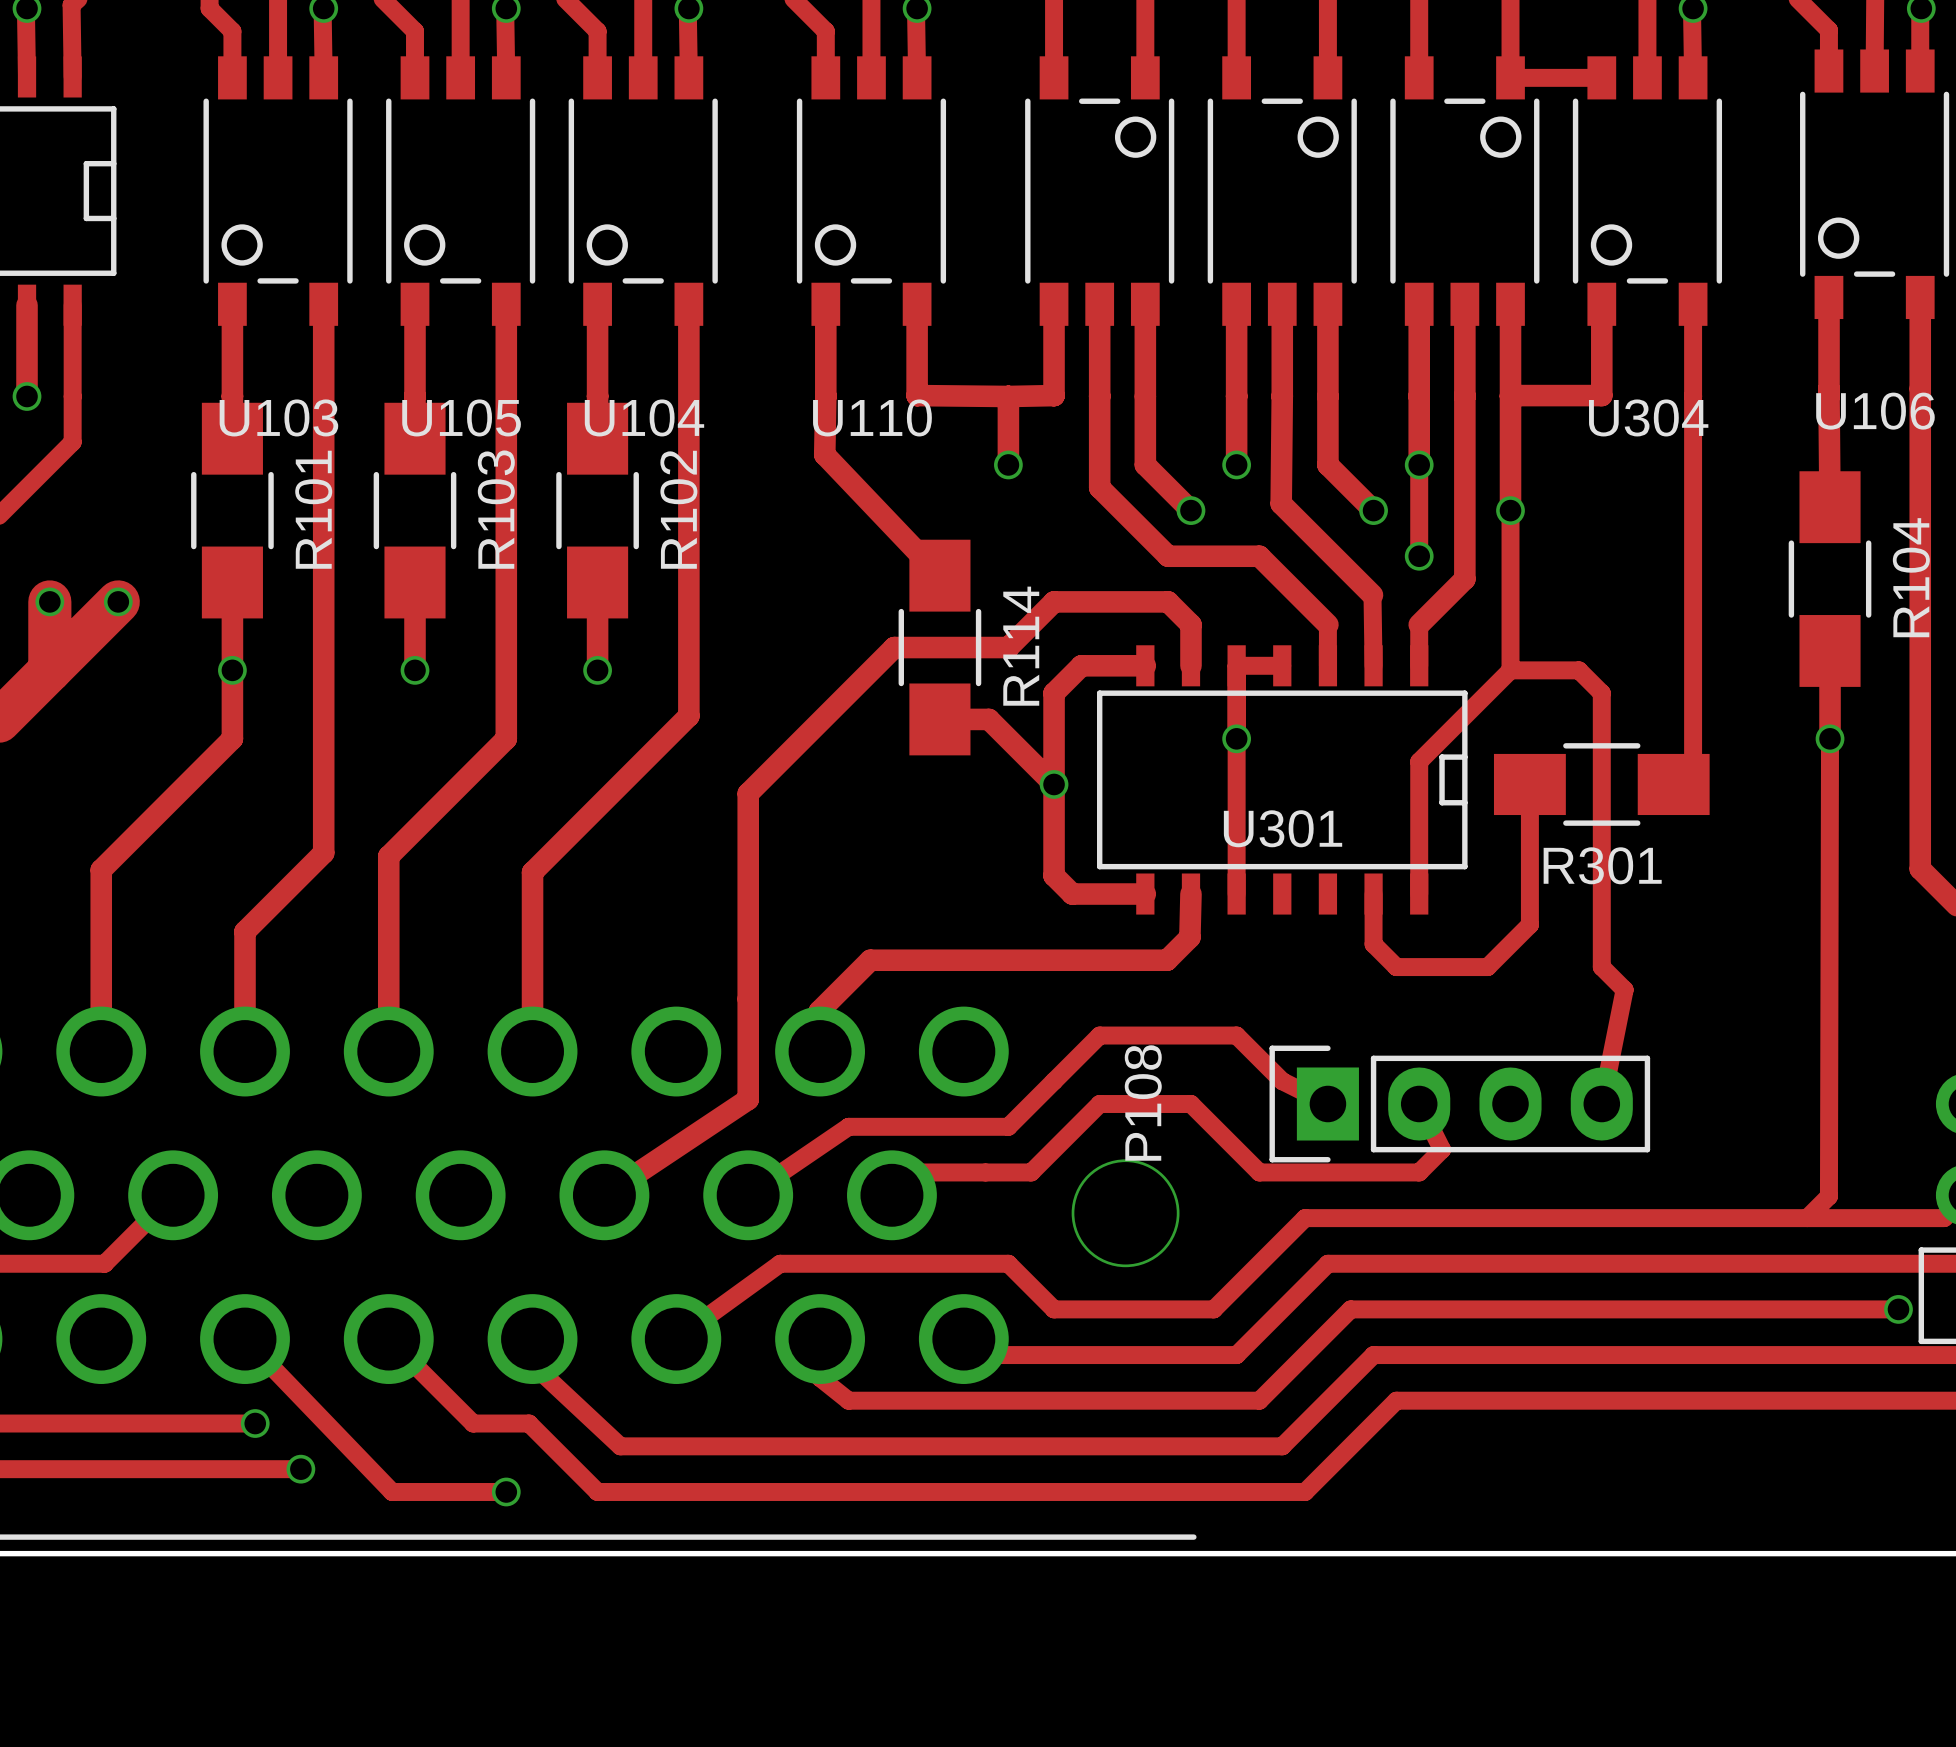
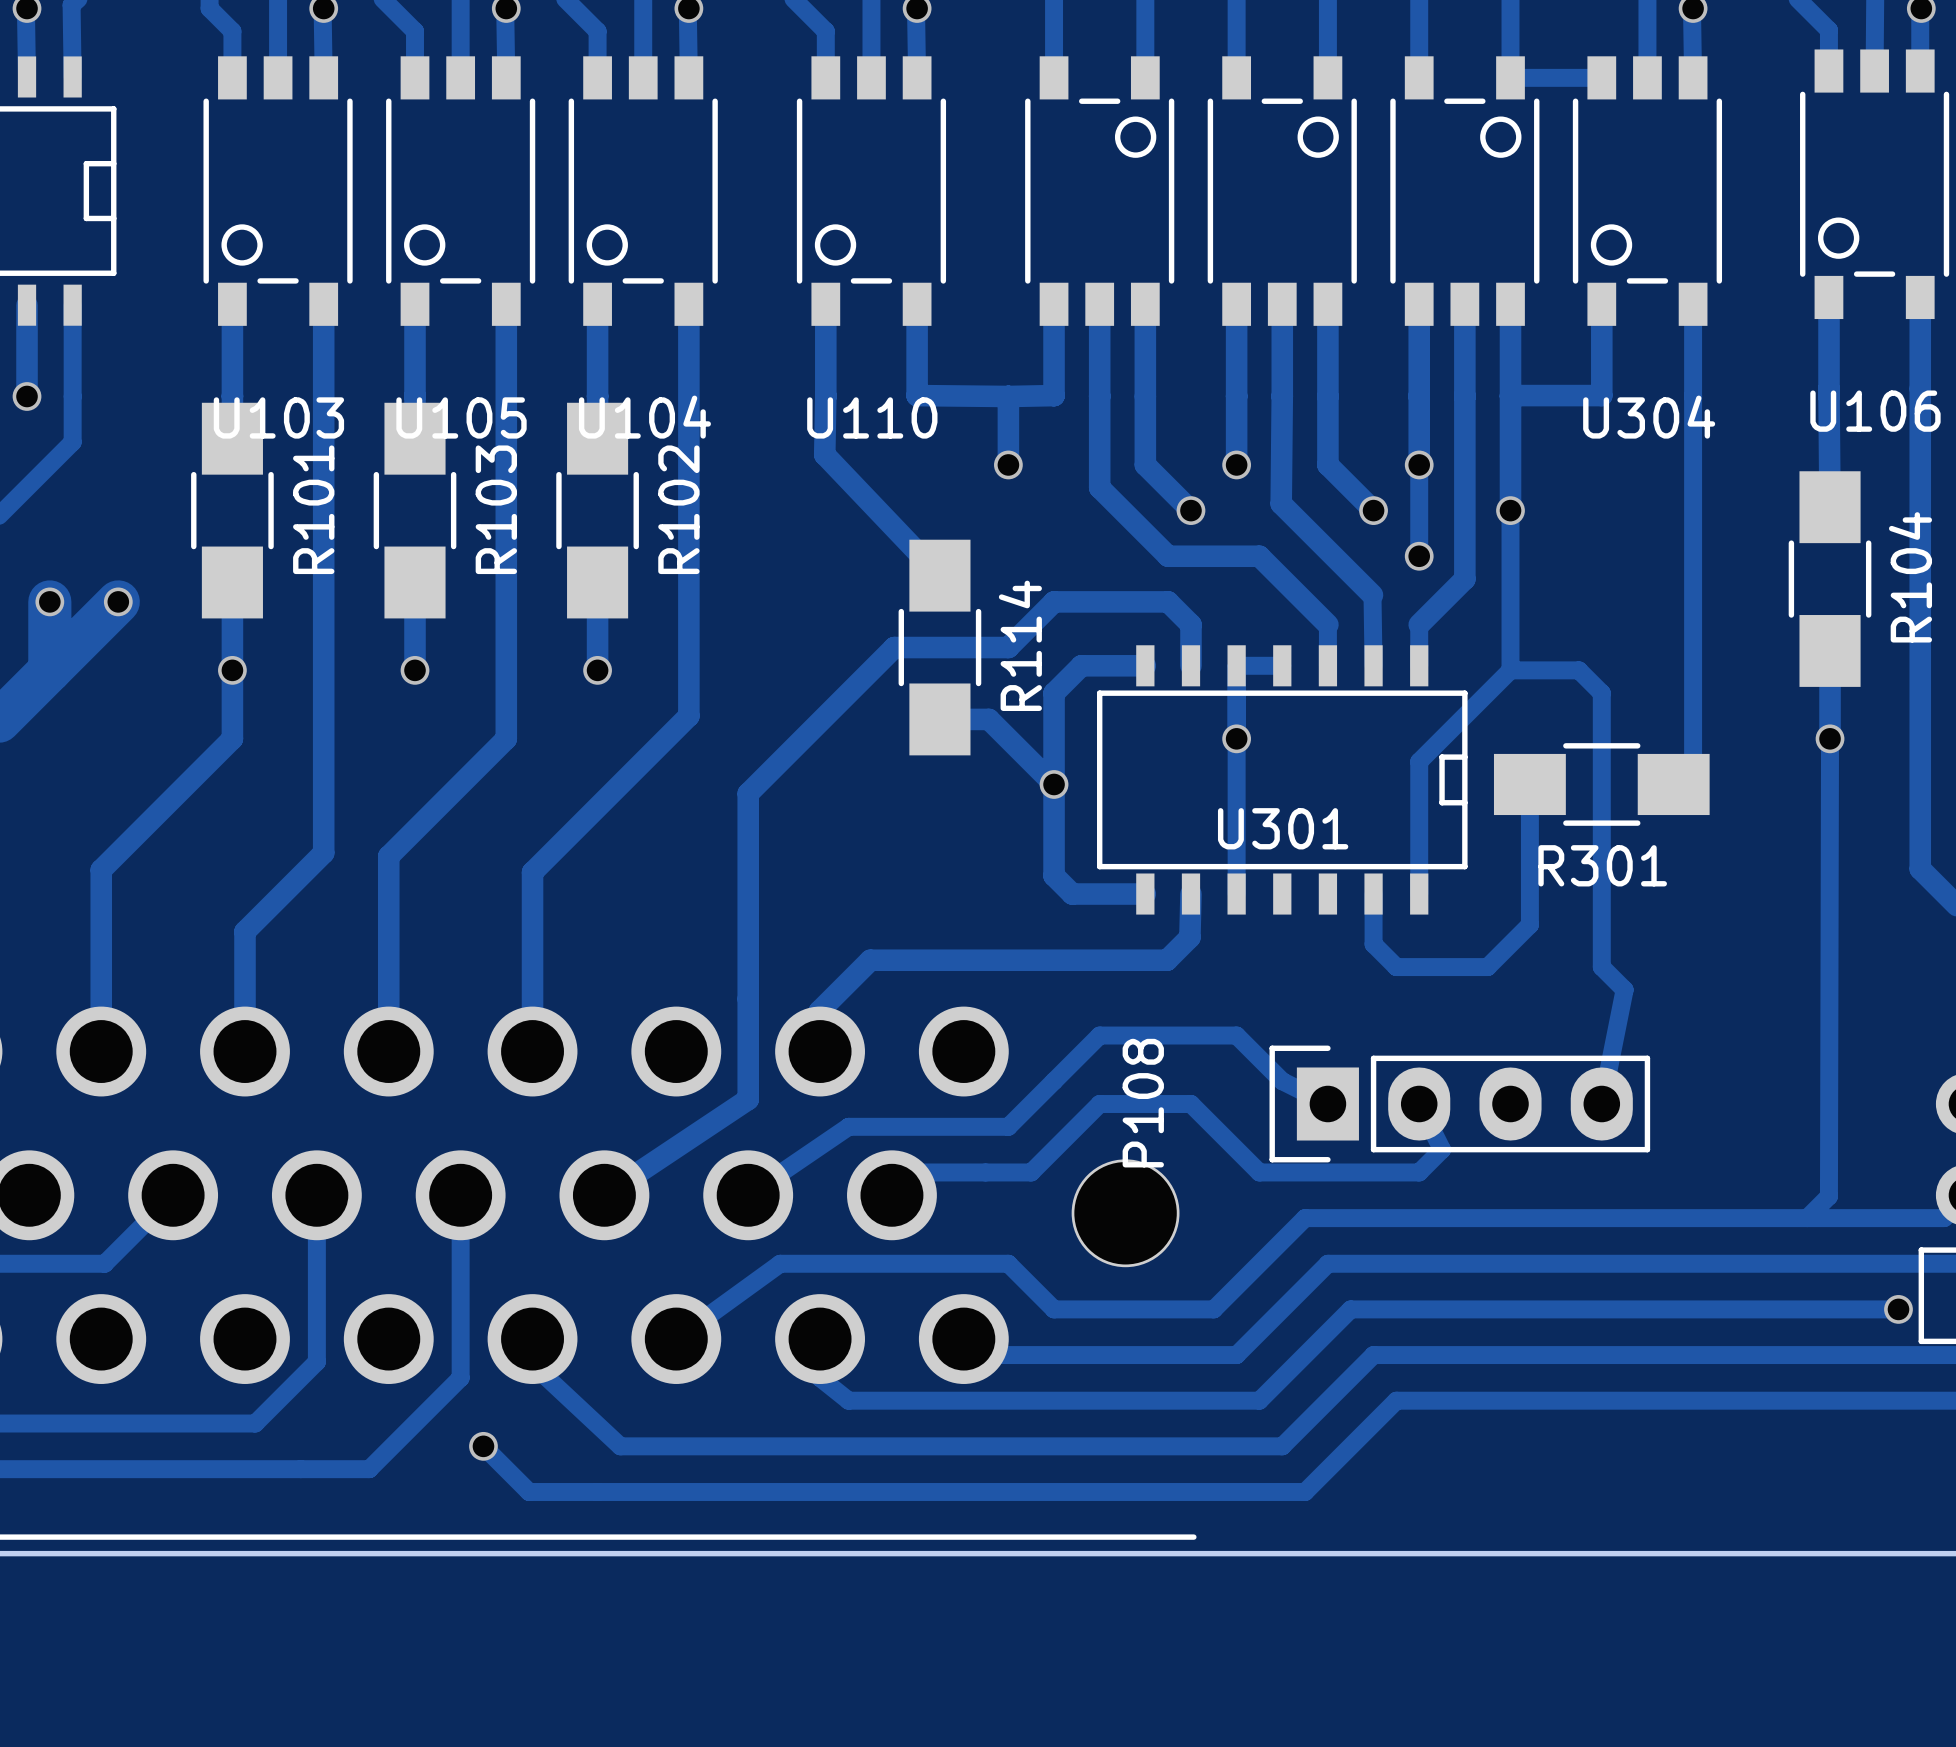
track: none -> (316, 1195) (316, 1361) (255, 1423)
track: none -> (460, 1195) (460, 1377) (369, 1469) (300, 1469)
track: (245, 1339) (392, 1491) (506, 1491) -> none
track: (388, 1339) (473, 1423) (529, 1423) (597, 1491) -> (483, 1446) (529, 1491) (597, 1491)
via: (255, 1423) -> none
via: (300, 1469) -> none
via position: (506, 1491) -> (483, 1446)

